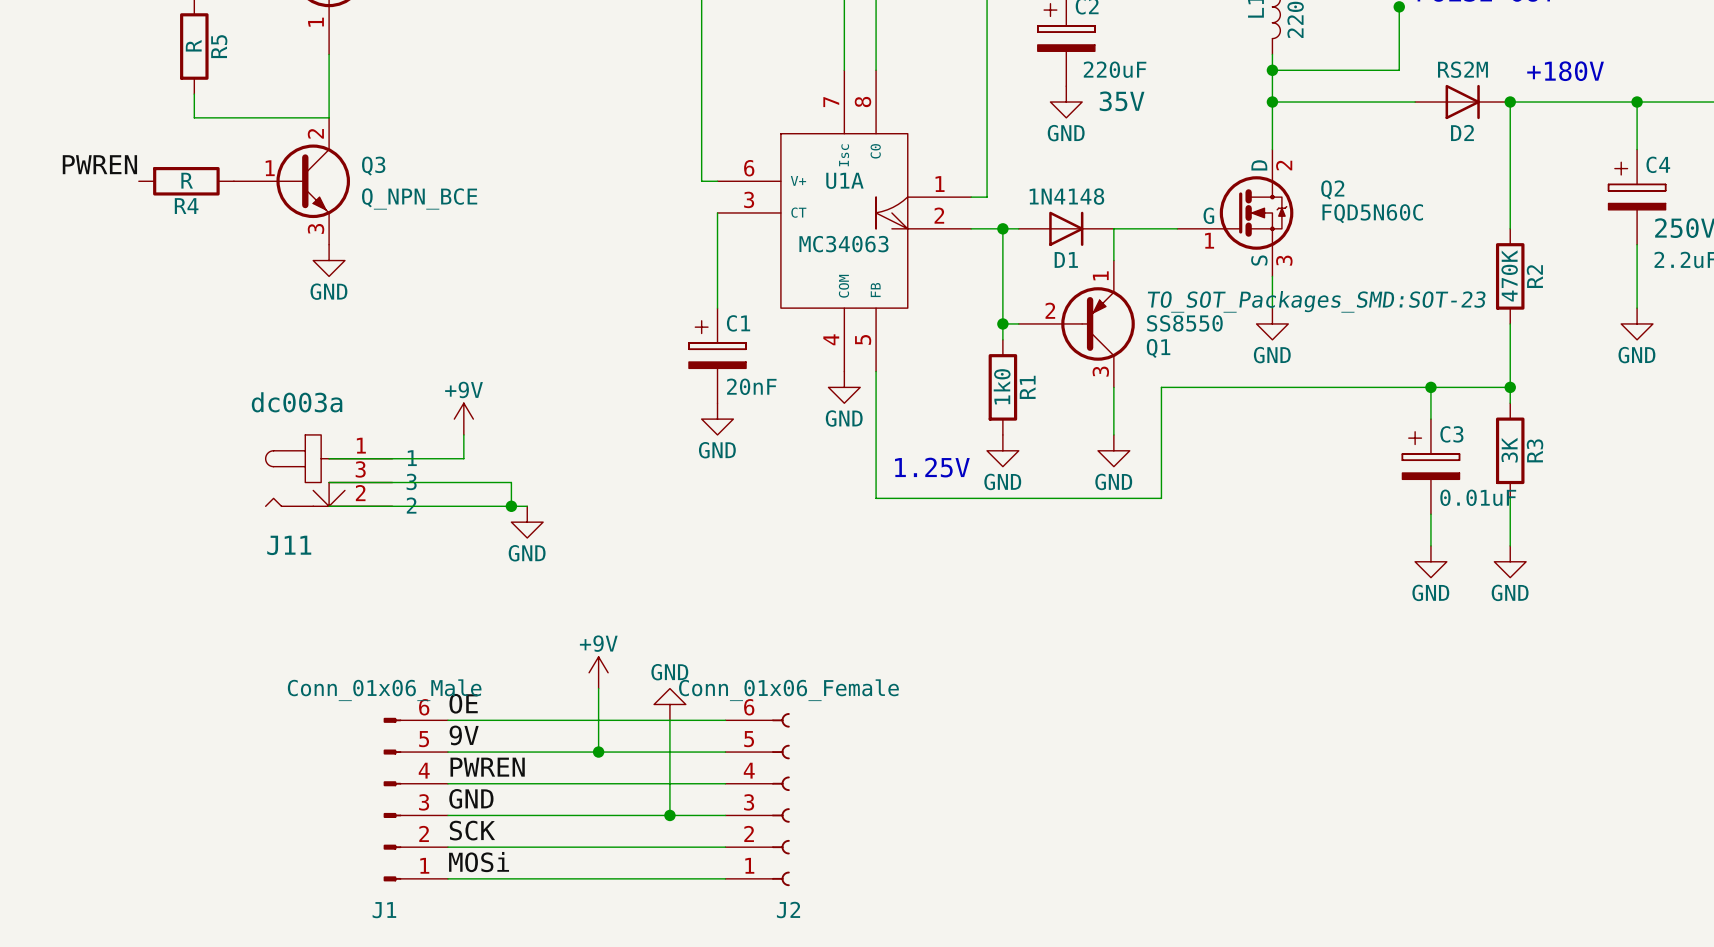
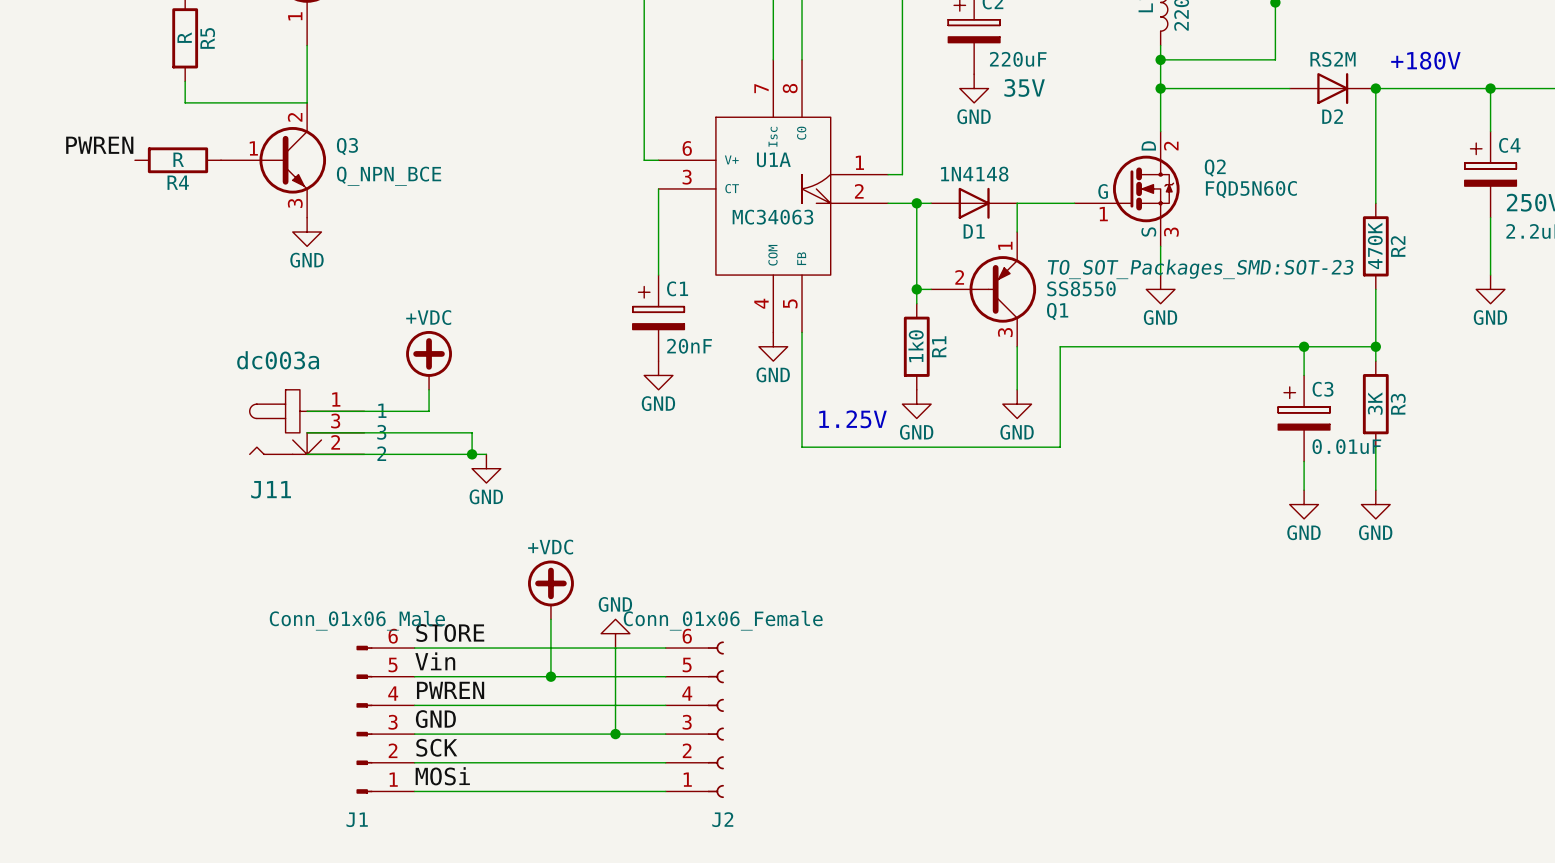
power symbol: none -> +VDC (429, 360)
power symbol: +9V (463, 419) -> none
power symbol: none -> +VDC (550, 589)
power symbol: +9V (598, 672) -> none
label: OE (463, 703) -> STORE (450, 633)
label: 9V (464, 735) -> Vin (435, 661)

